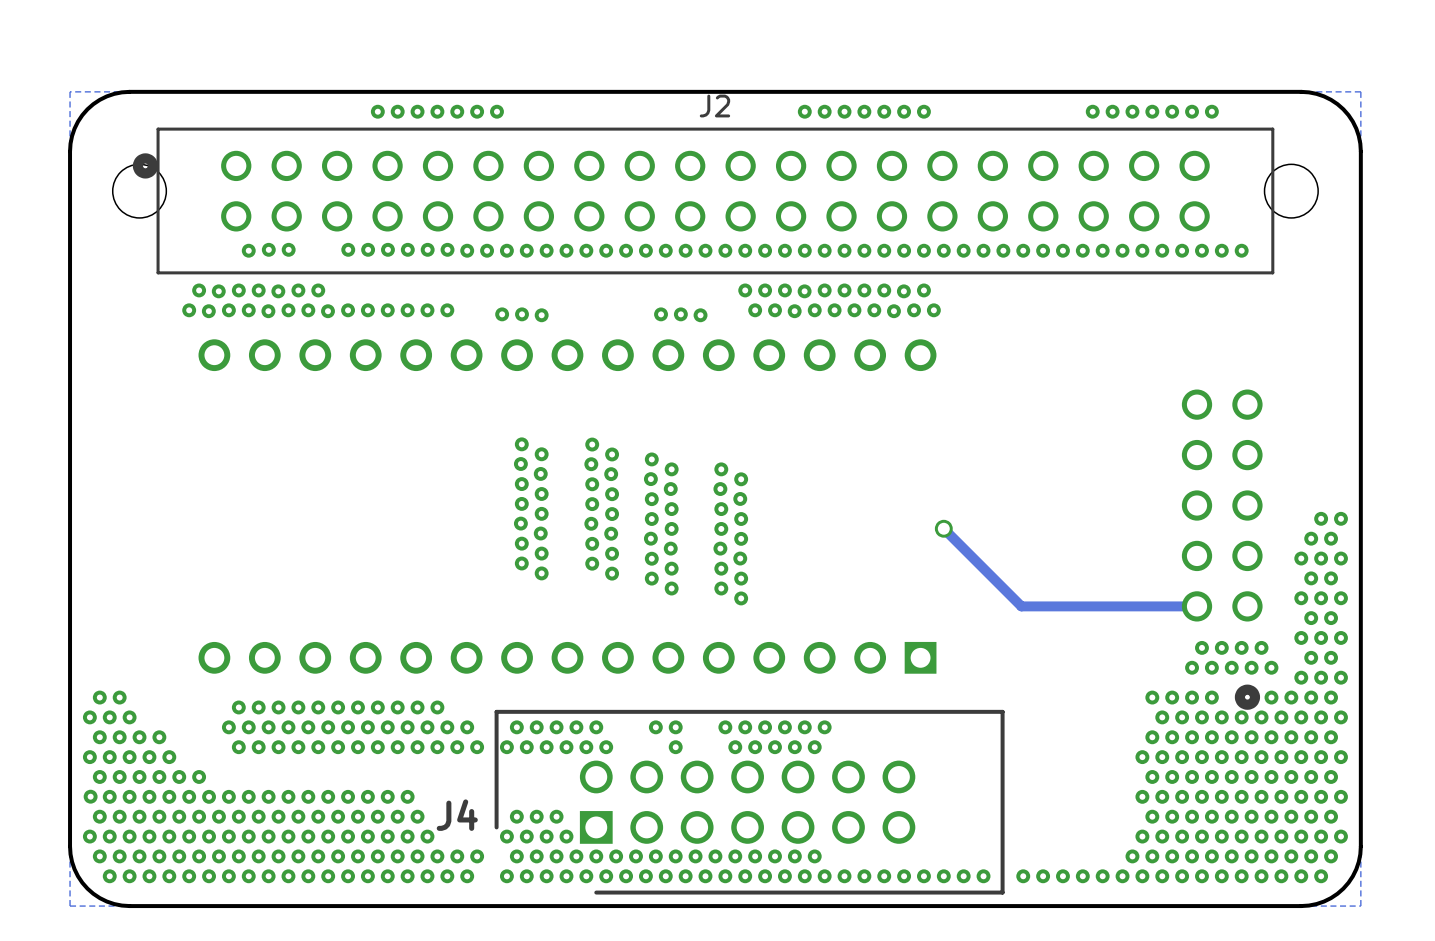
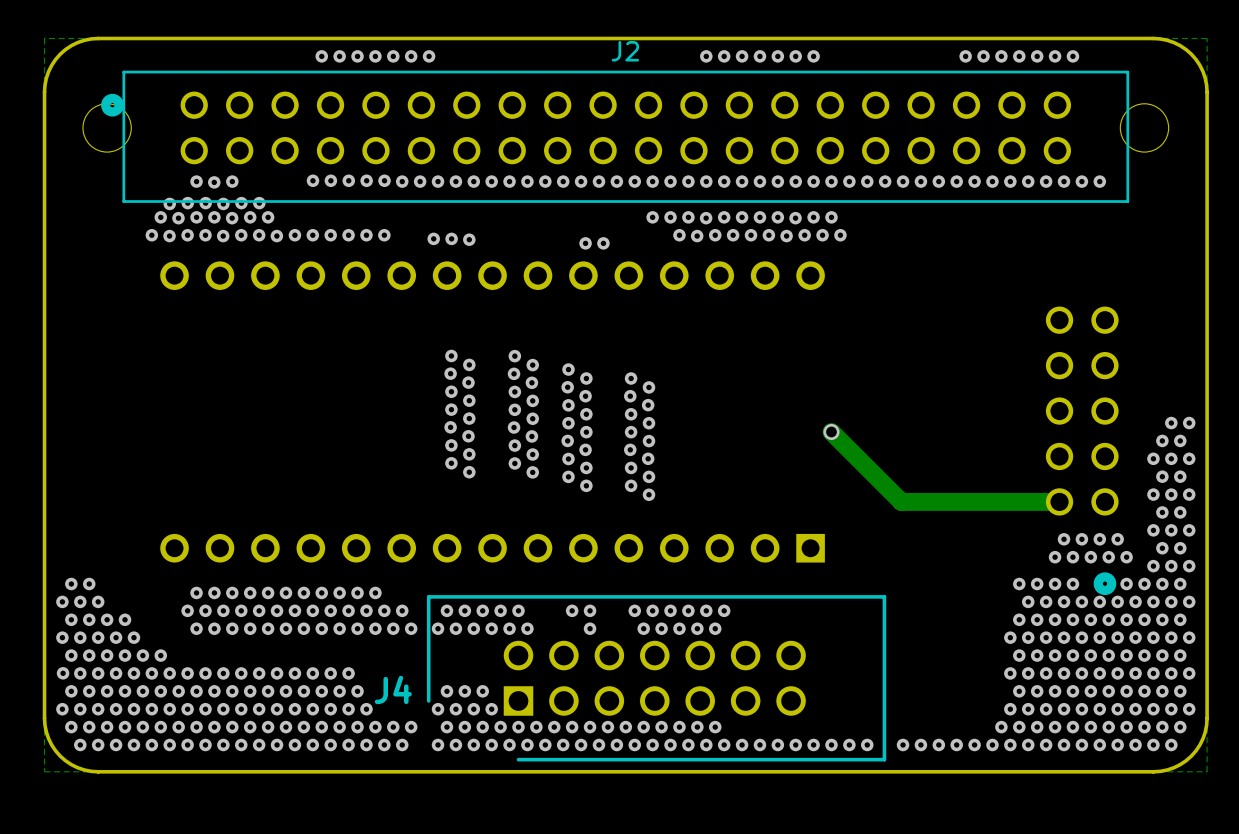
via: (268, 249) -> none
via: (288, 249) -> none
via: (348, 249) -> none
via: none -> (196, 181)
via: (248, 250) -> none
via: none -> (232, 181)
via: none -> (214, 182)
via: none -> (187, 203)
via: none -> (205, 203)
via: none -> (241, 203)
via: none -> (259, 203)
via: none -> (169, 203)
via: none -> (223, 203)
via: none -> (831, 217)
via: (755, 310) -> none
via: none -> (840, 235)
via: (661, 314) -> none
via: (680, 314) -> none
via: (700, 315) -> none
via: none -> (585, 243)
via: none -> (603, 243)
track width: thin (943, 528) (1021, 606) (1197, 606) -> thick (831, 431) (901, 501) (1059, 501)

